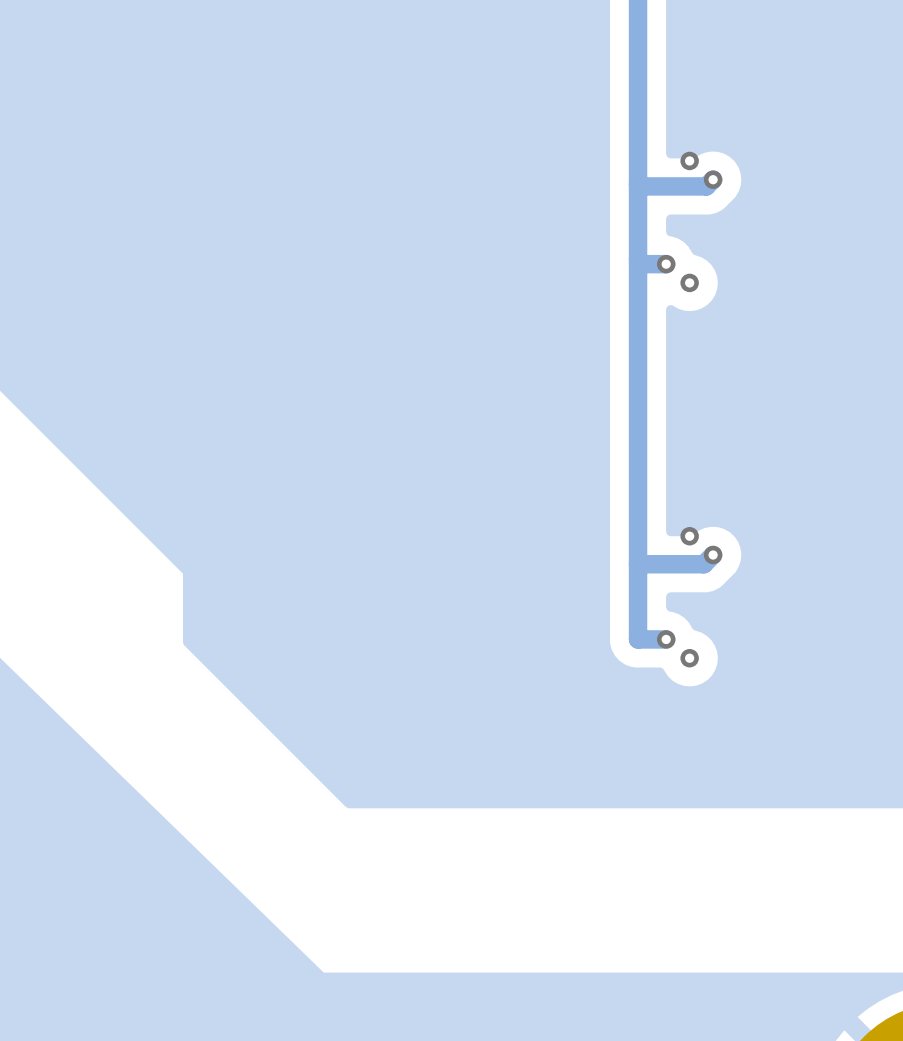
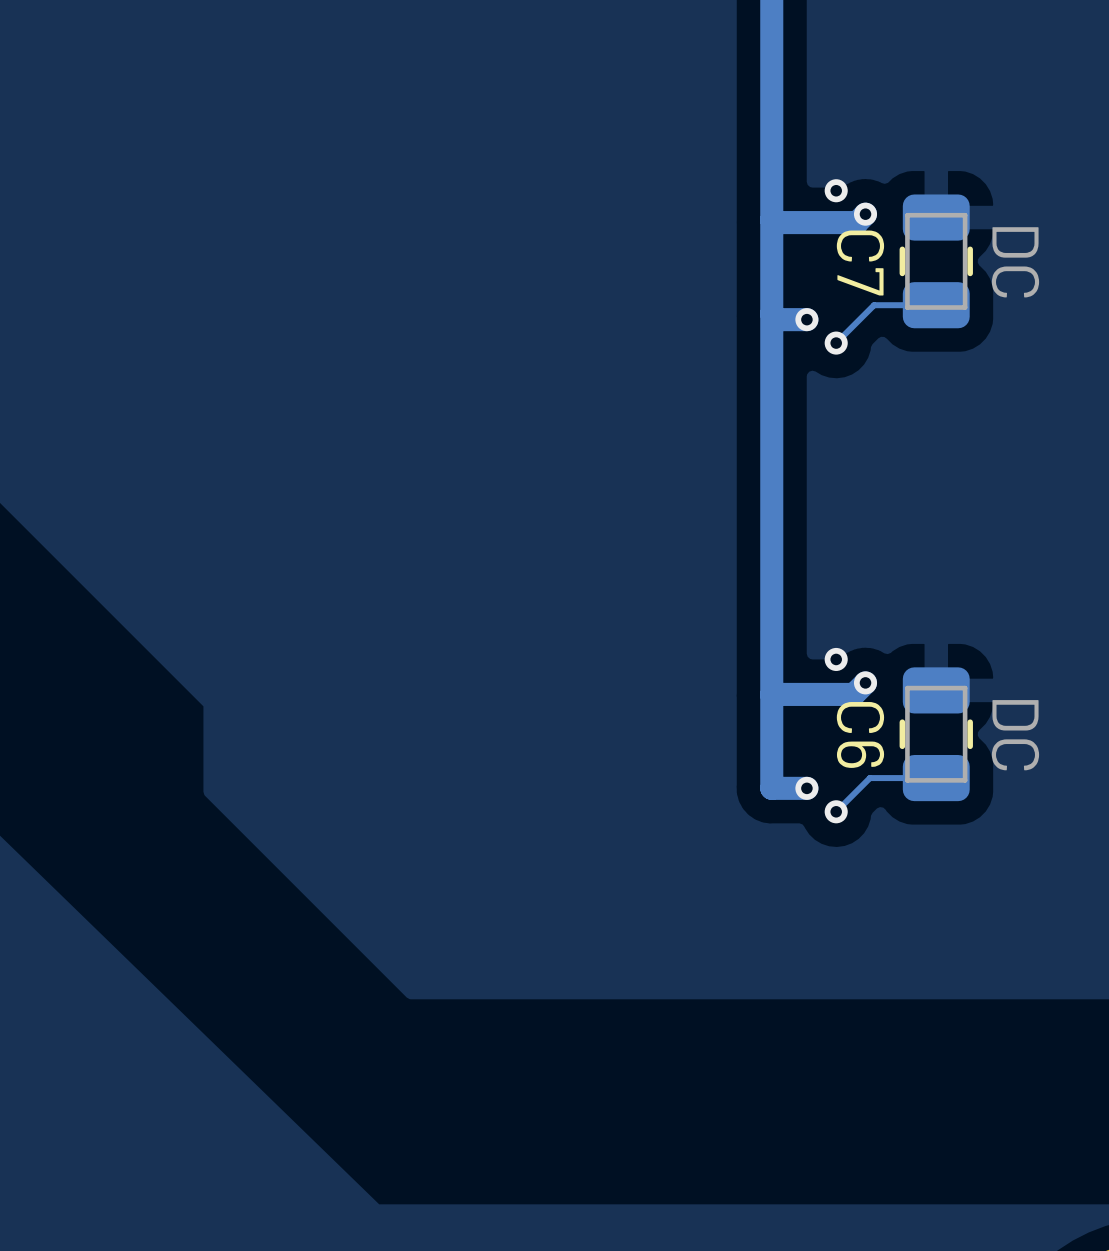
C7: none -> DC (936, 261)
track: none -> (936, 305) (874, 305) (836, 343)
C6: none -> DC (936, 734)
track: none -> (936, 778) (869, 778) (836, 811)

